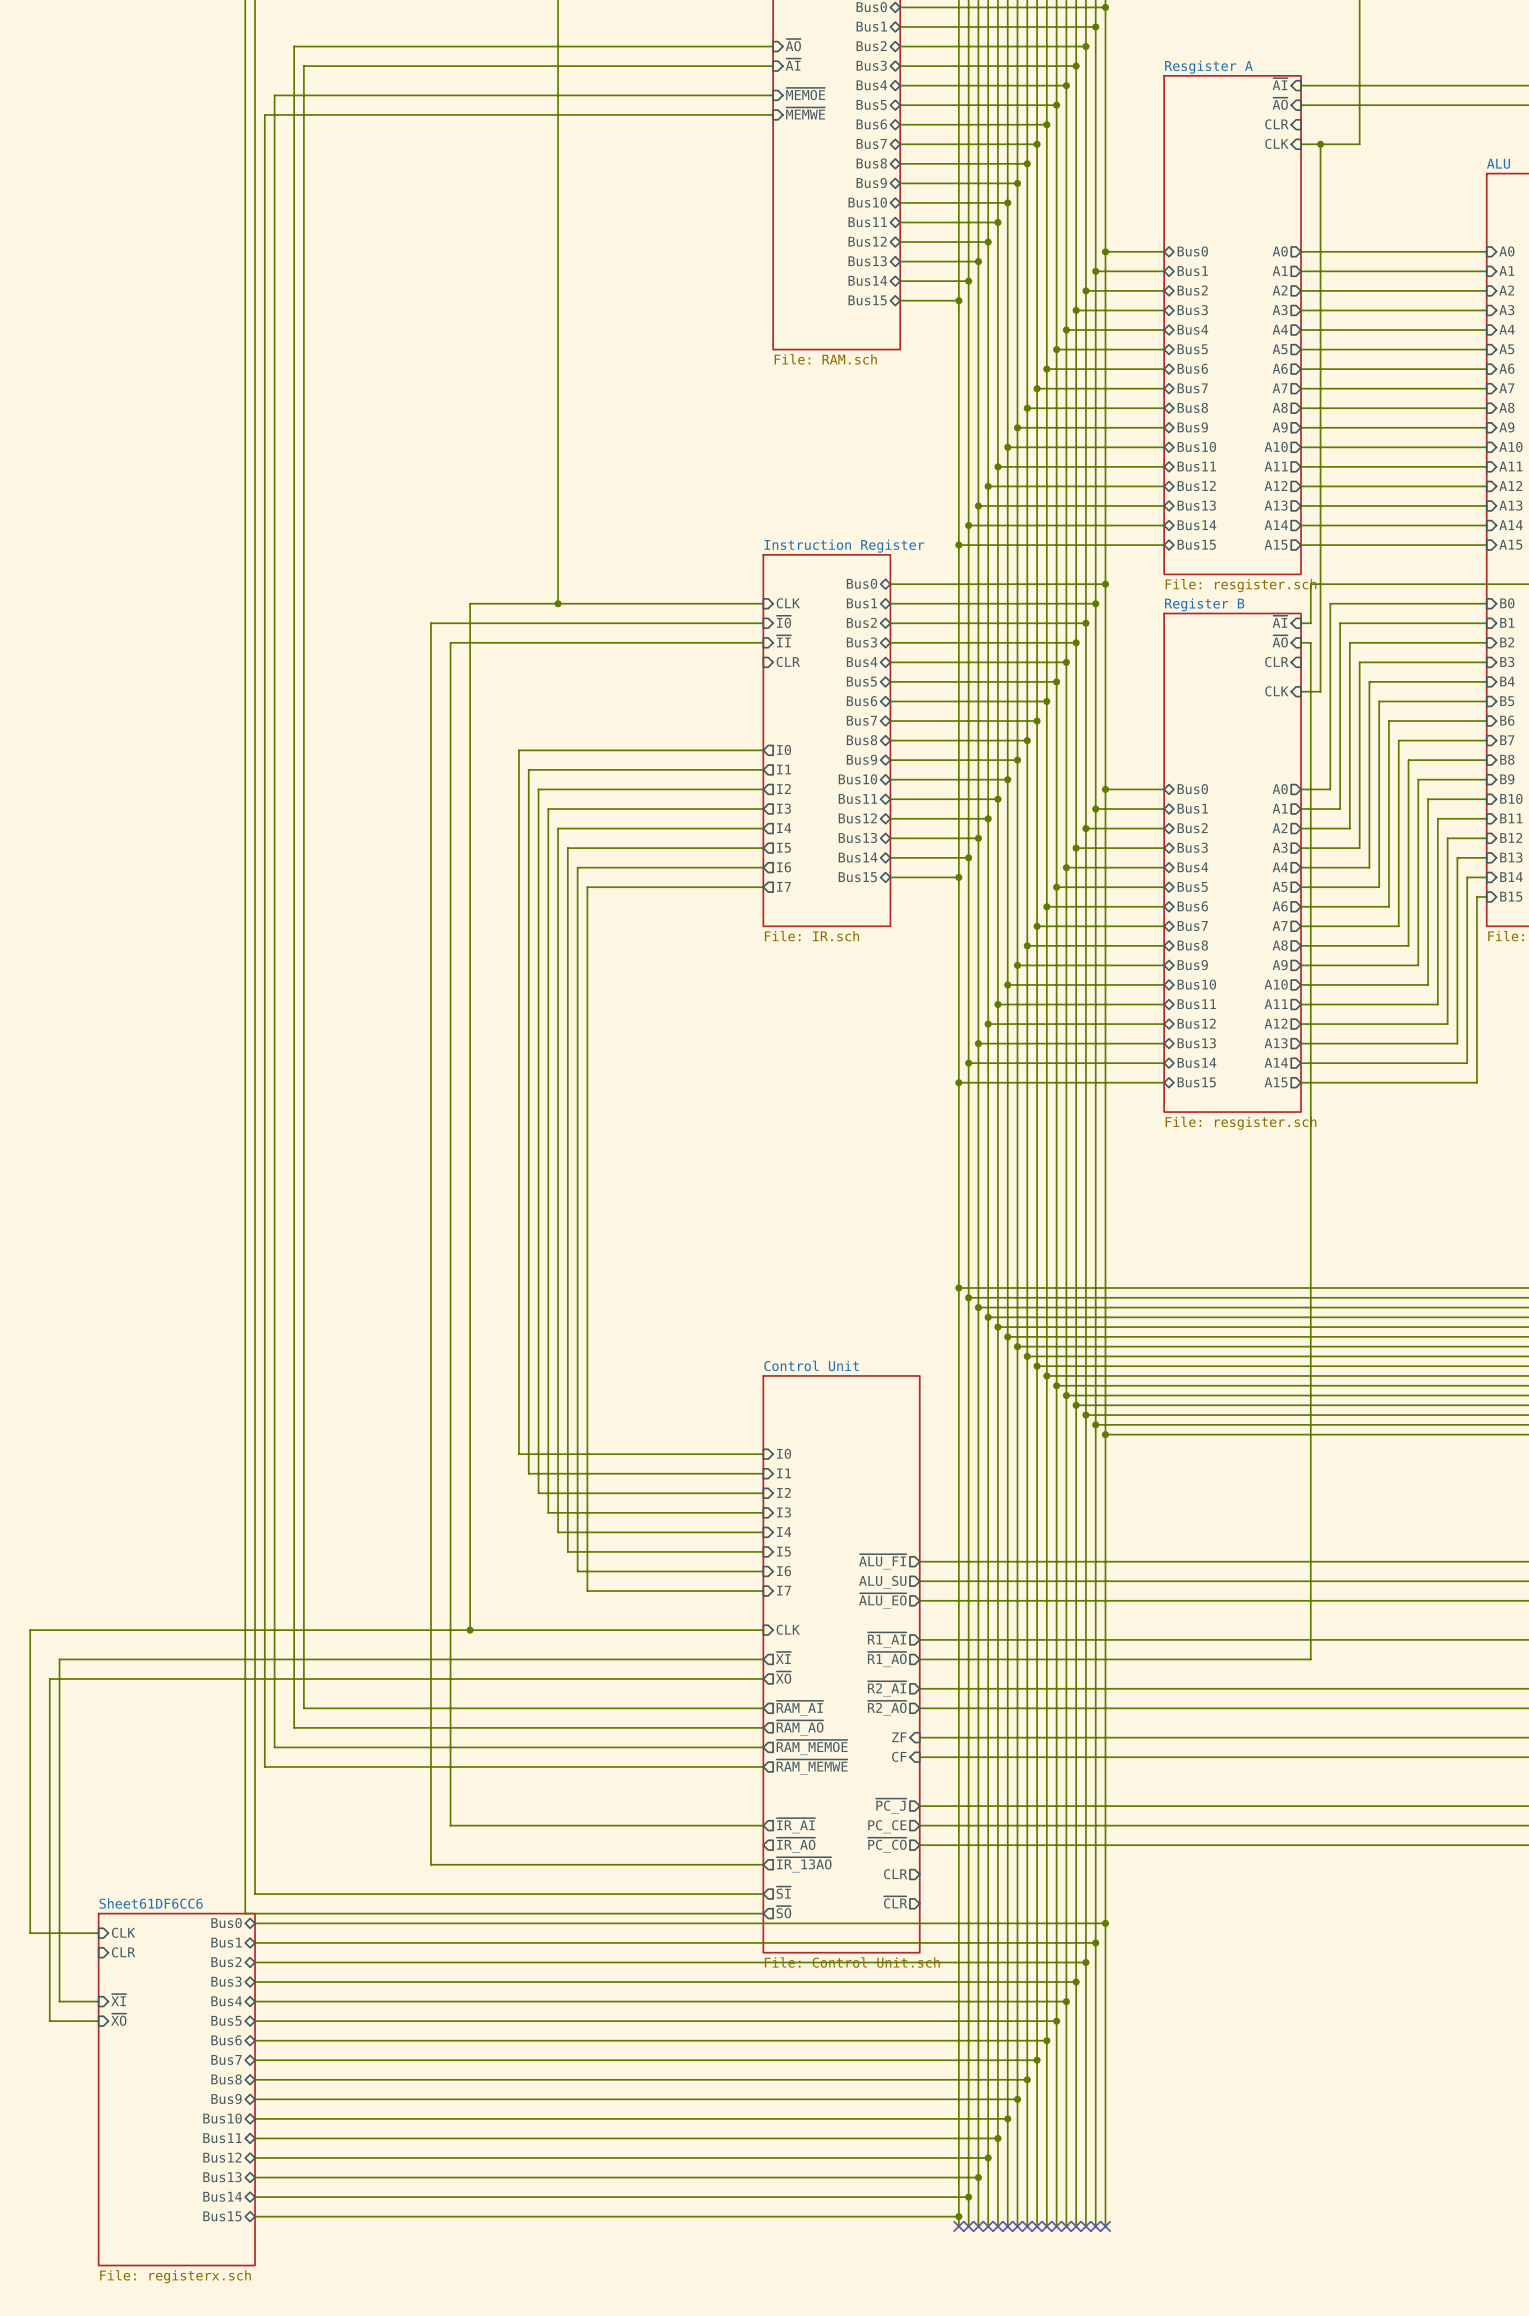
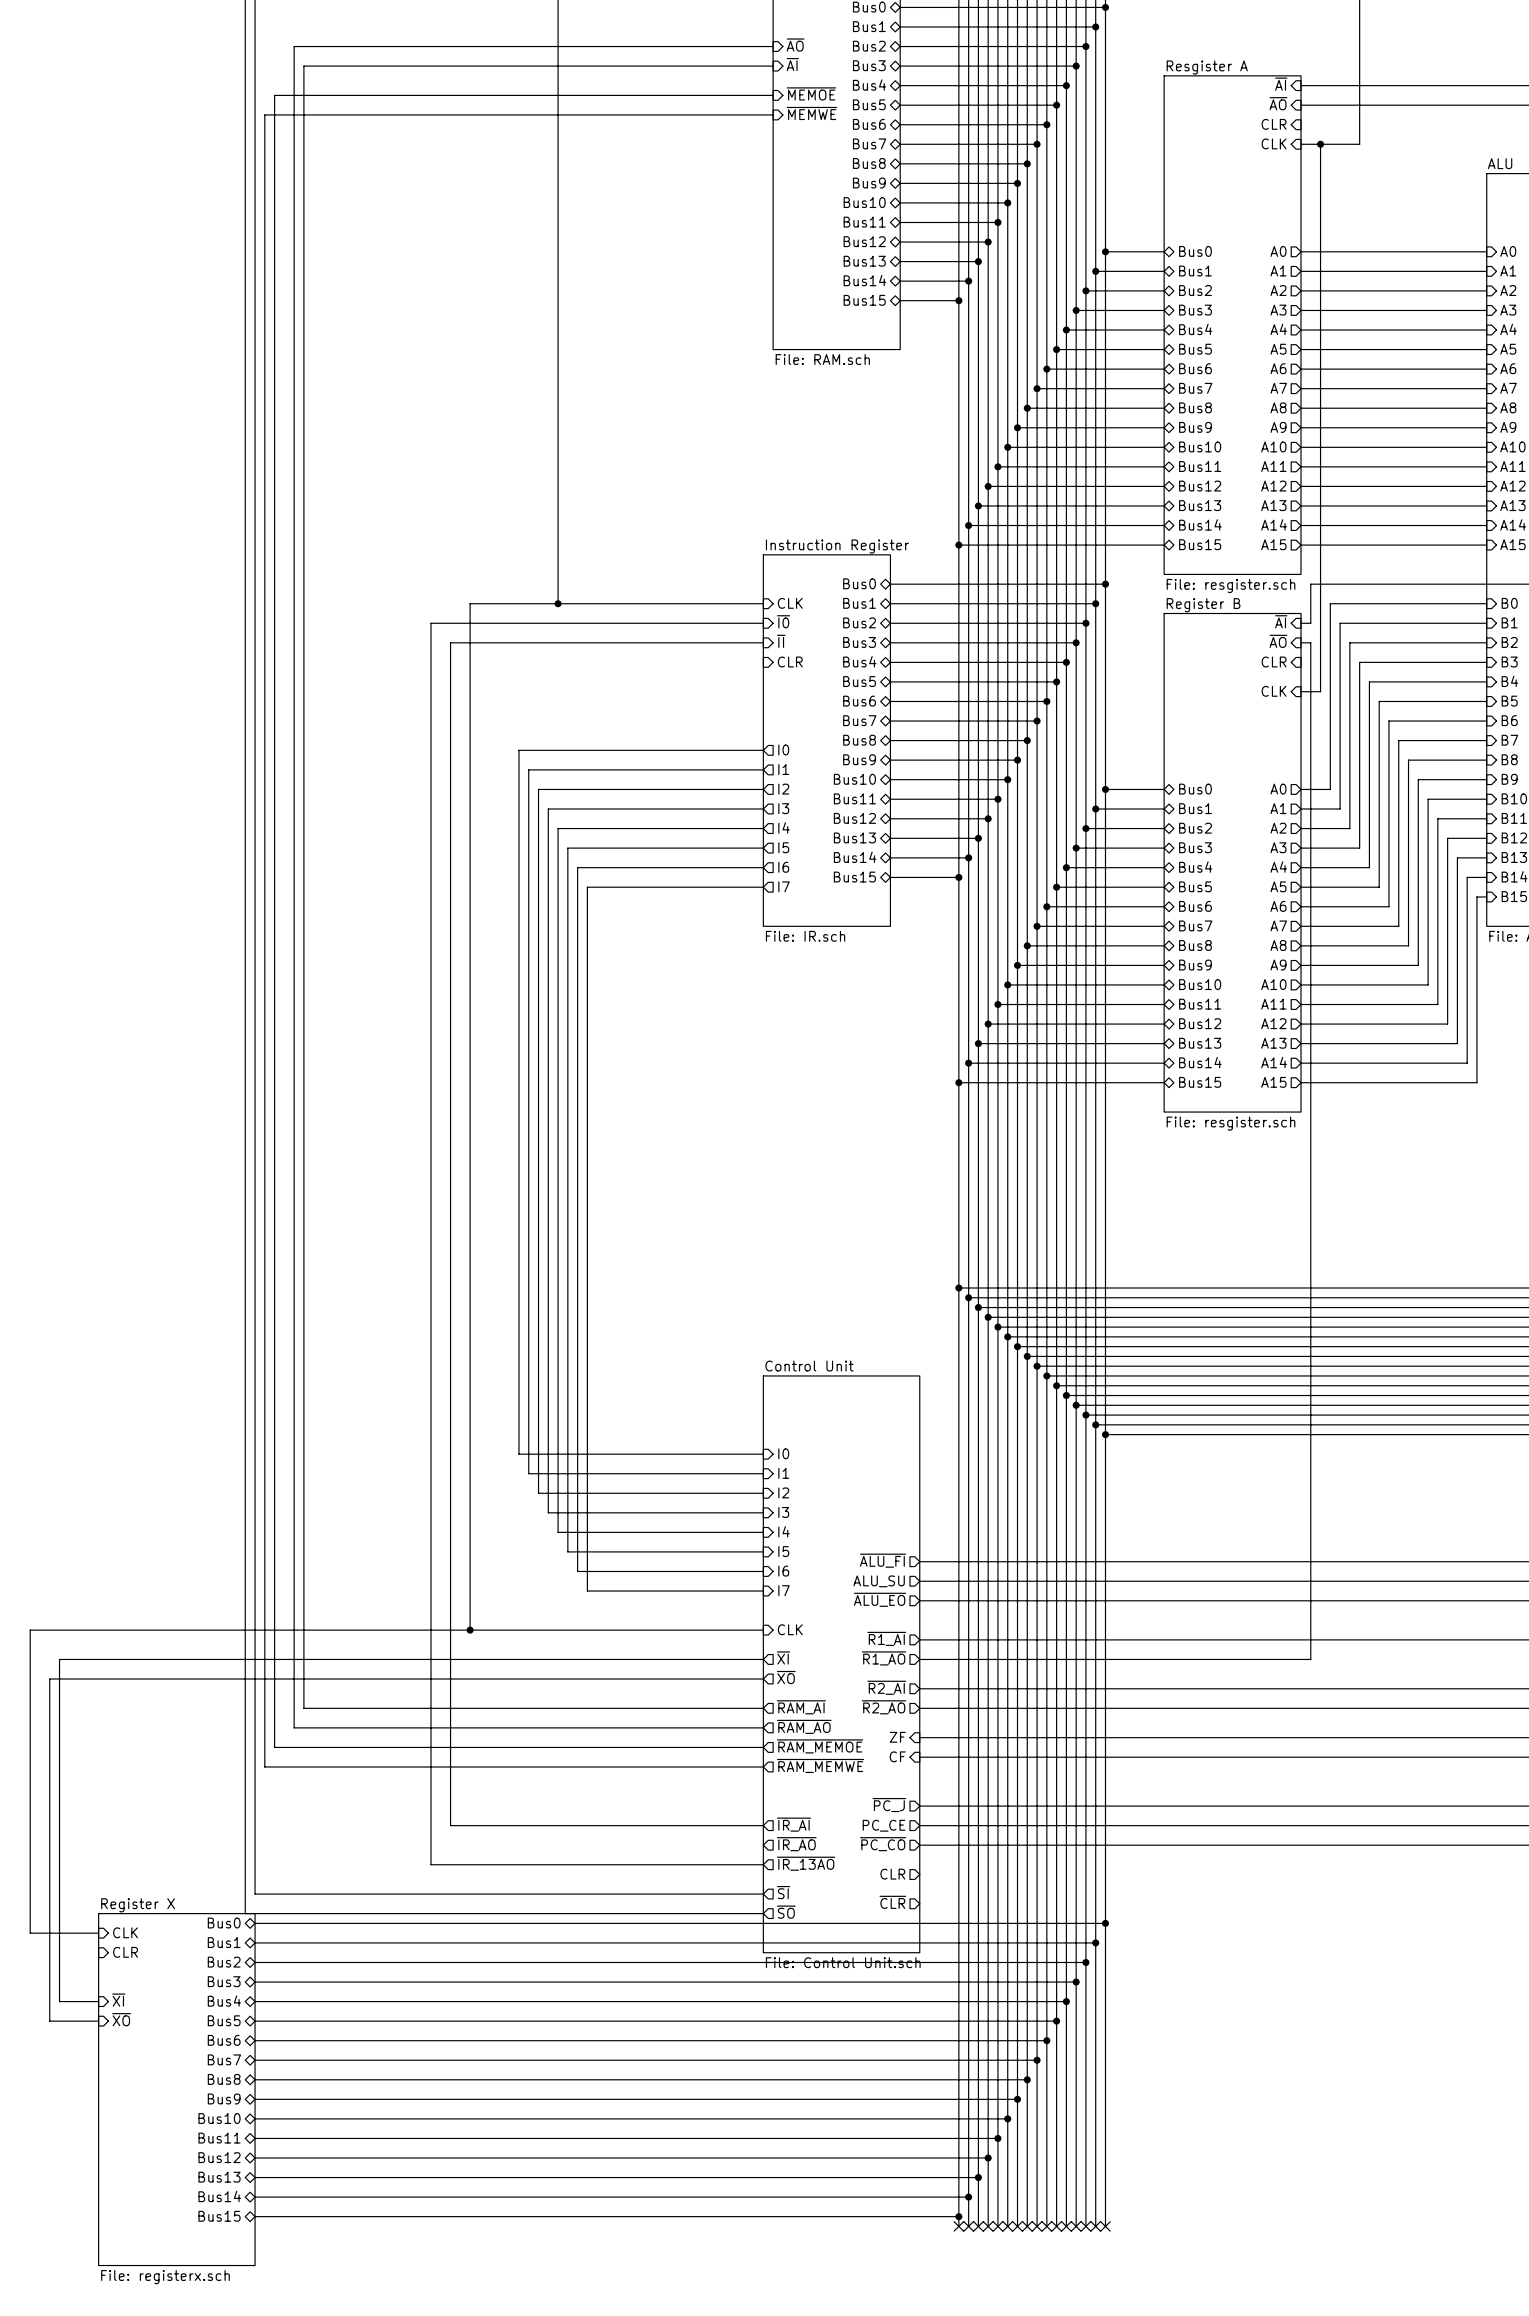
sheet Sheet61DF6CC6 name: Sheet61DF6CC6 (151, 1903) -> Register X (138, 1905)

